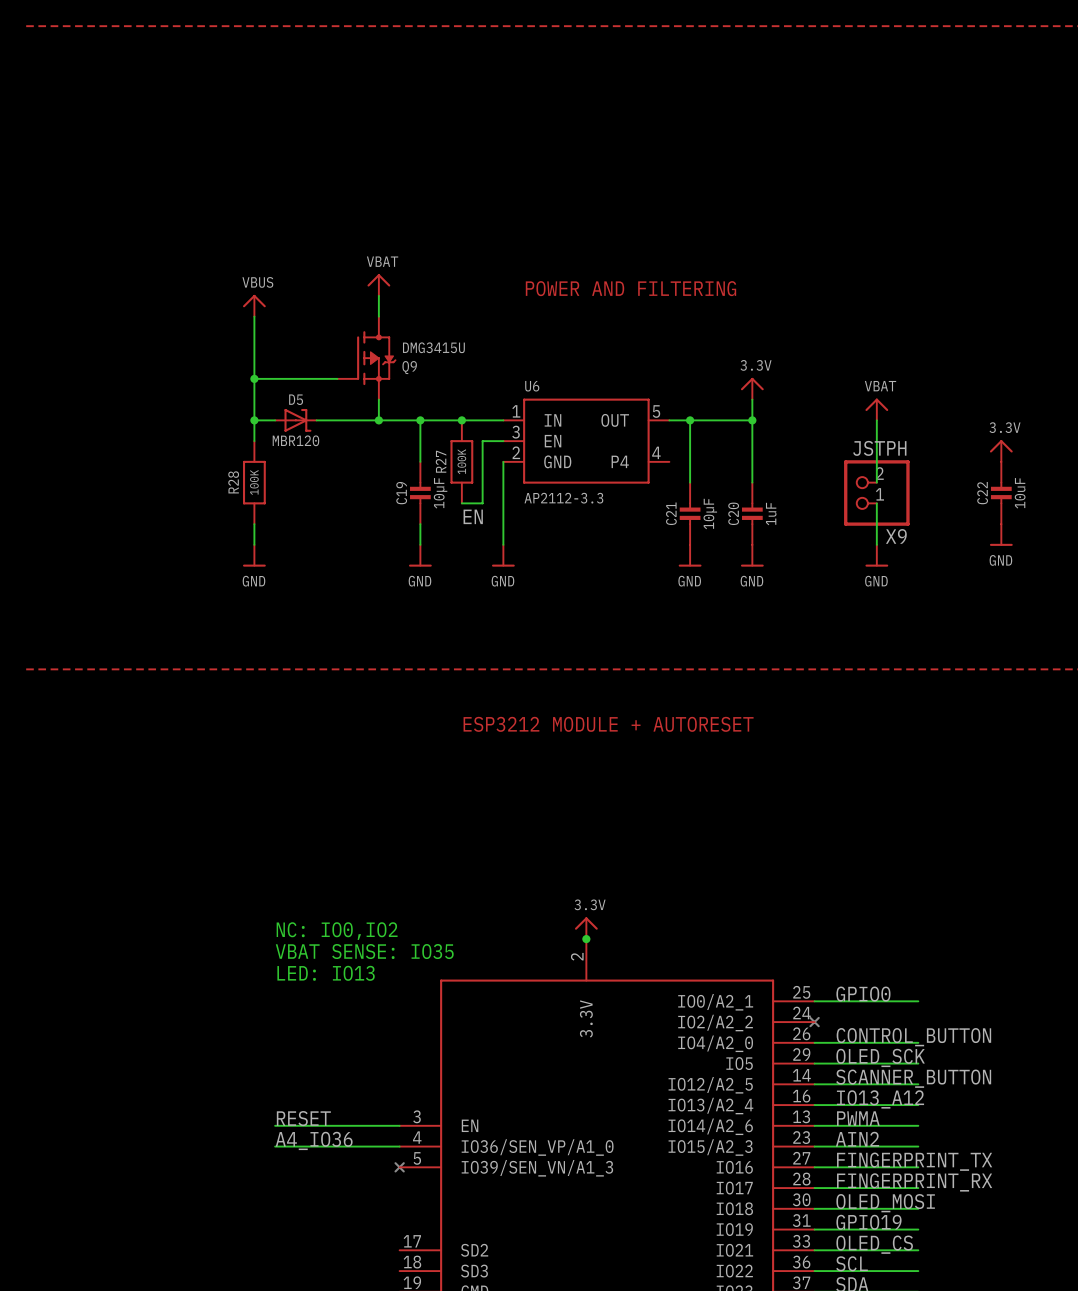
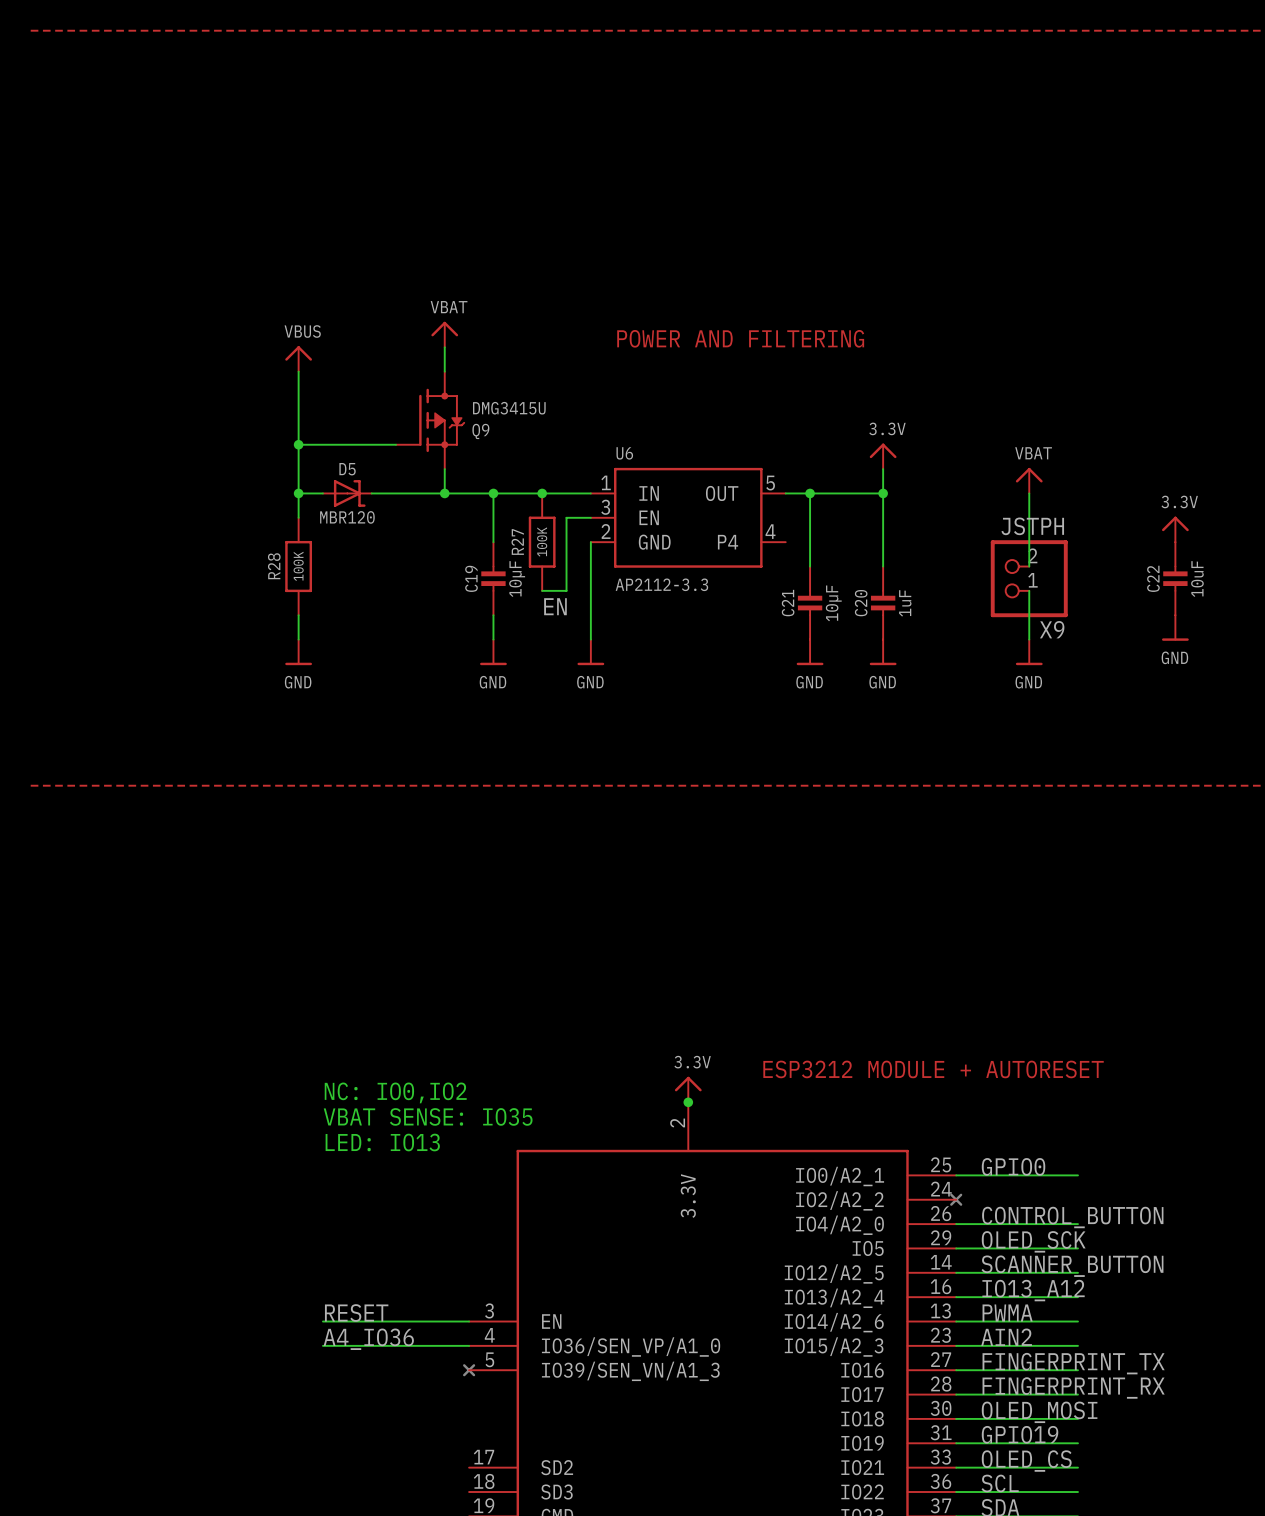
text: ESP3212 MODULE + AUTORESET (608, 724) -> none
text: none -> ESP3212 MODULE + AUTORESET (933, 1069)

